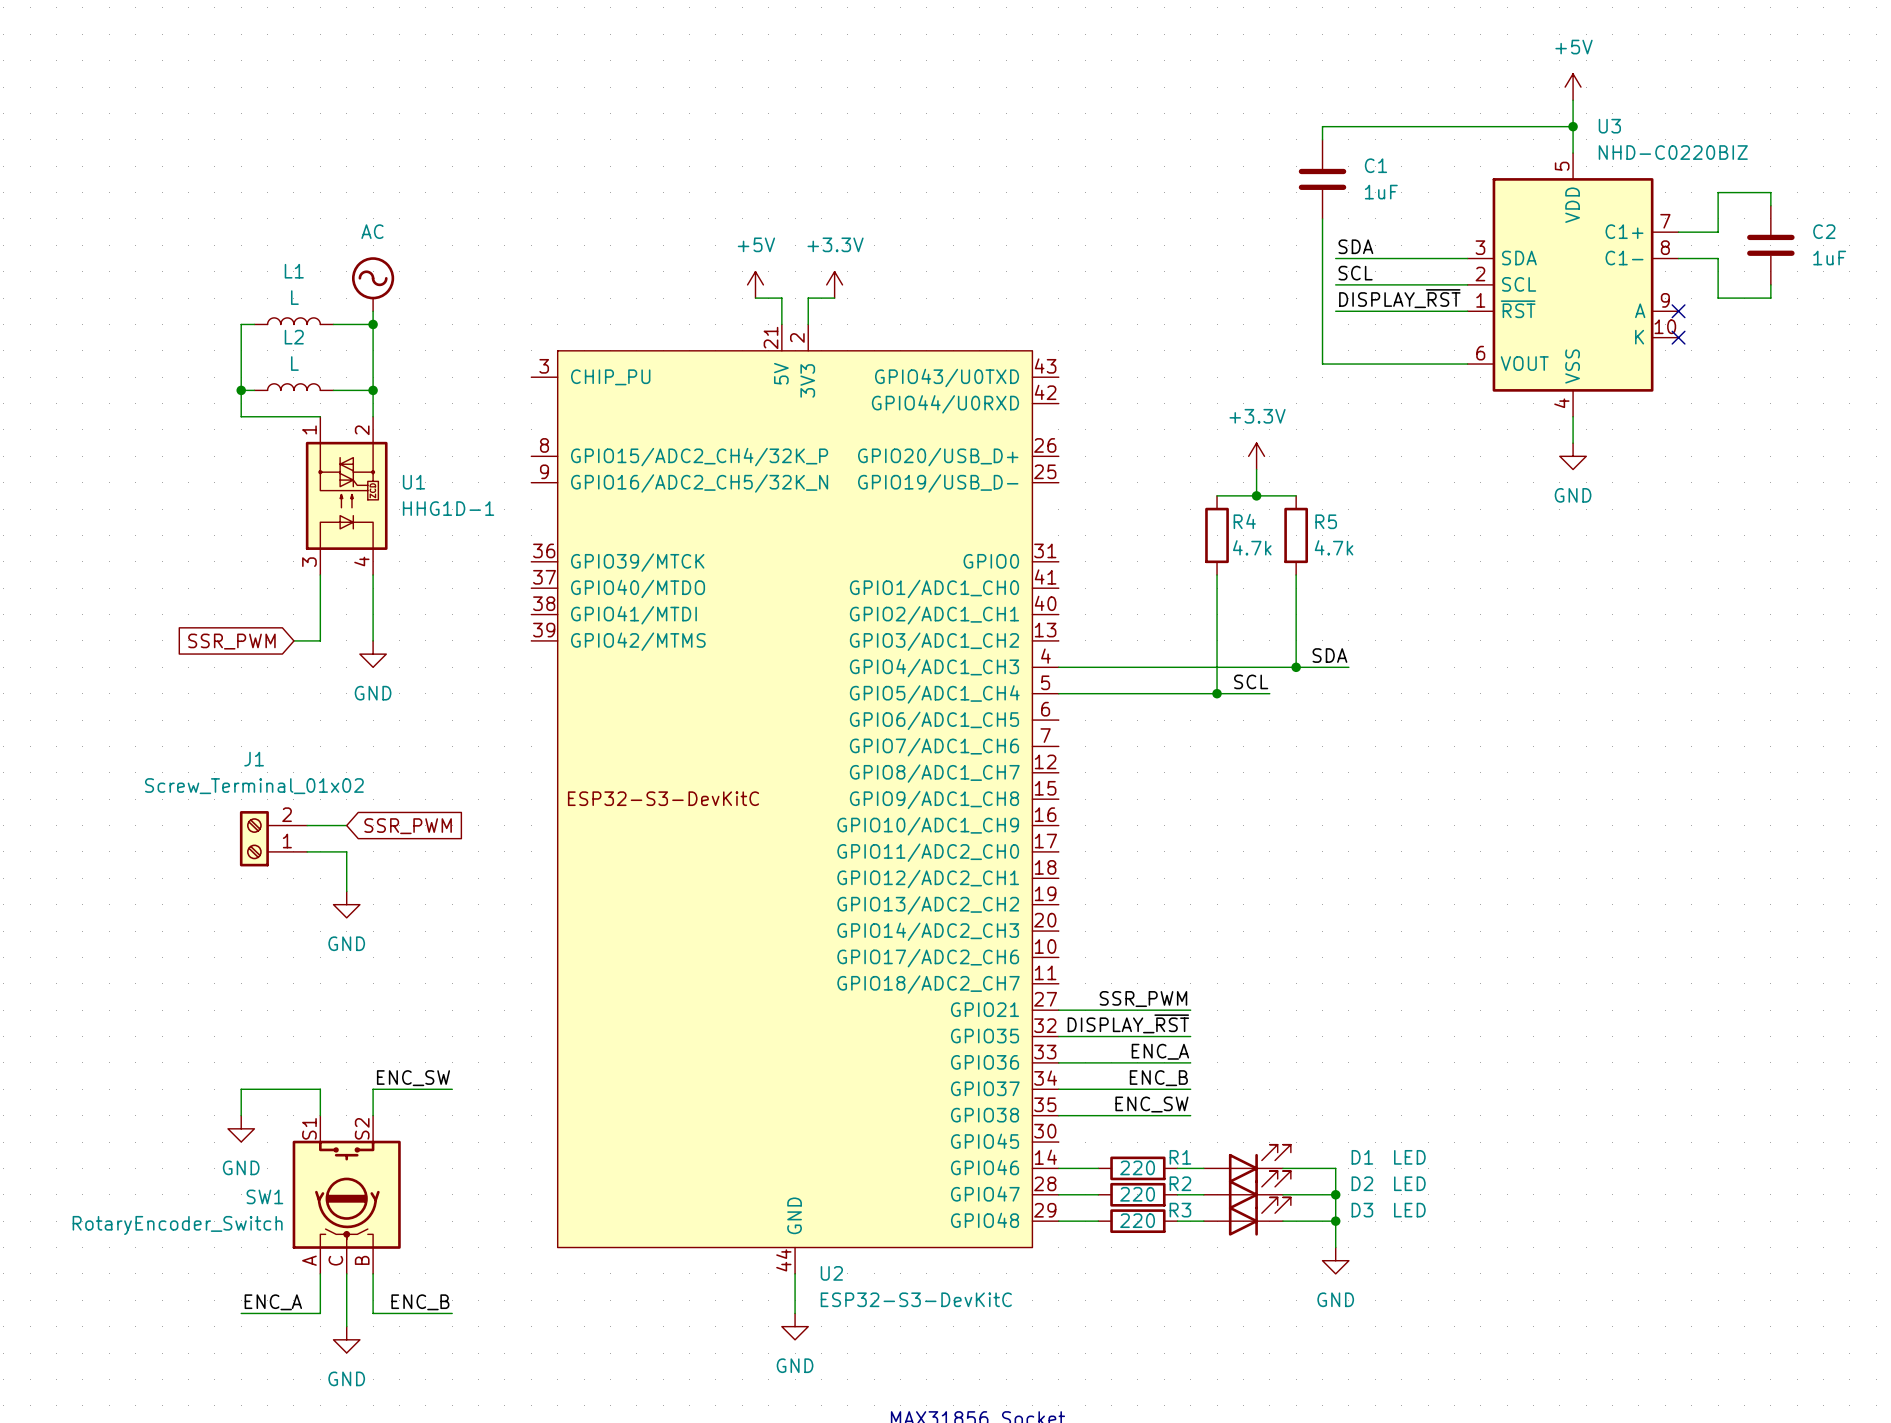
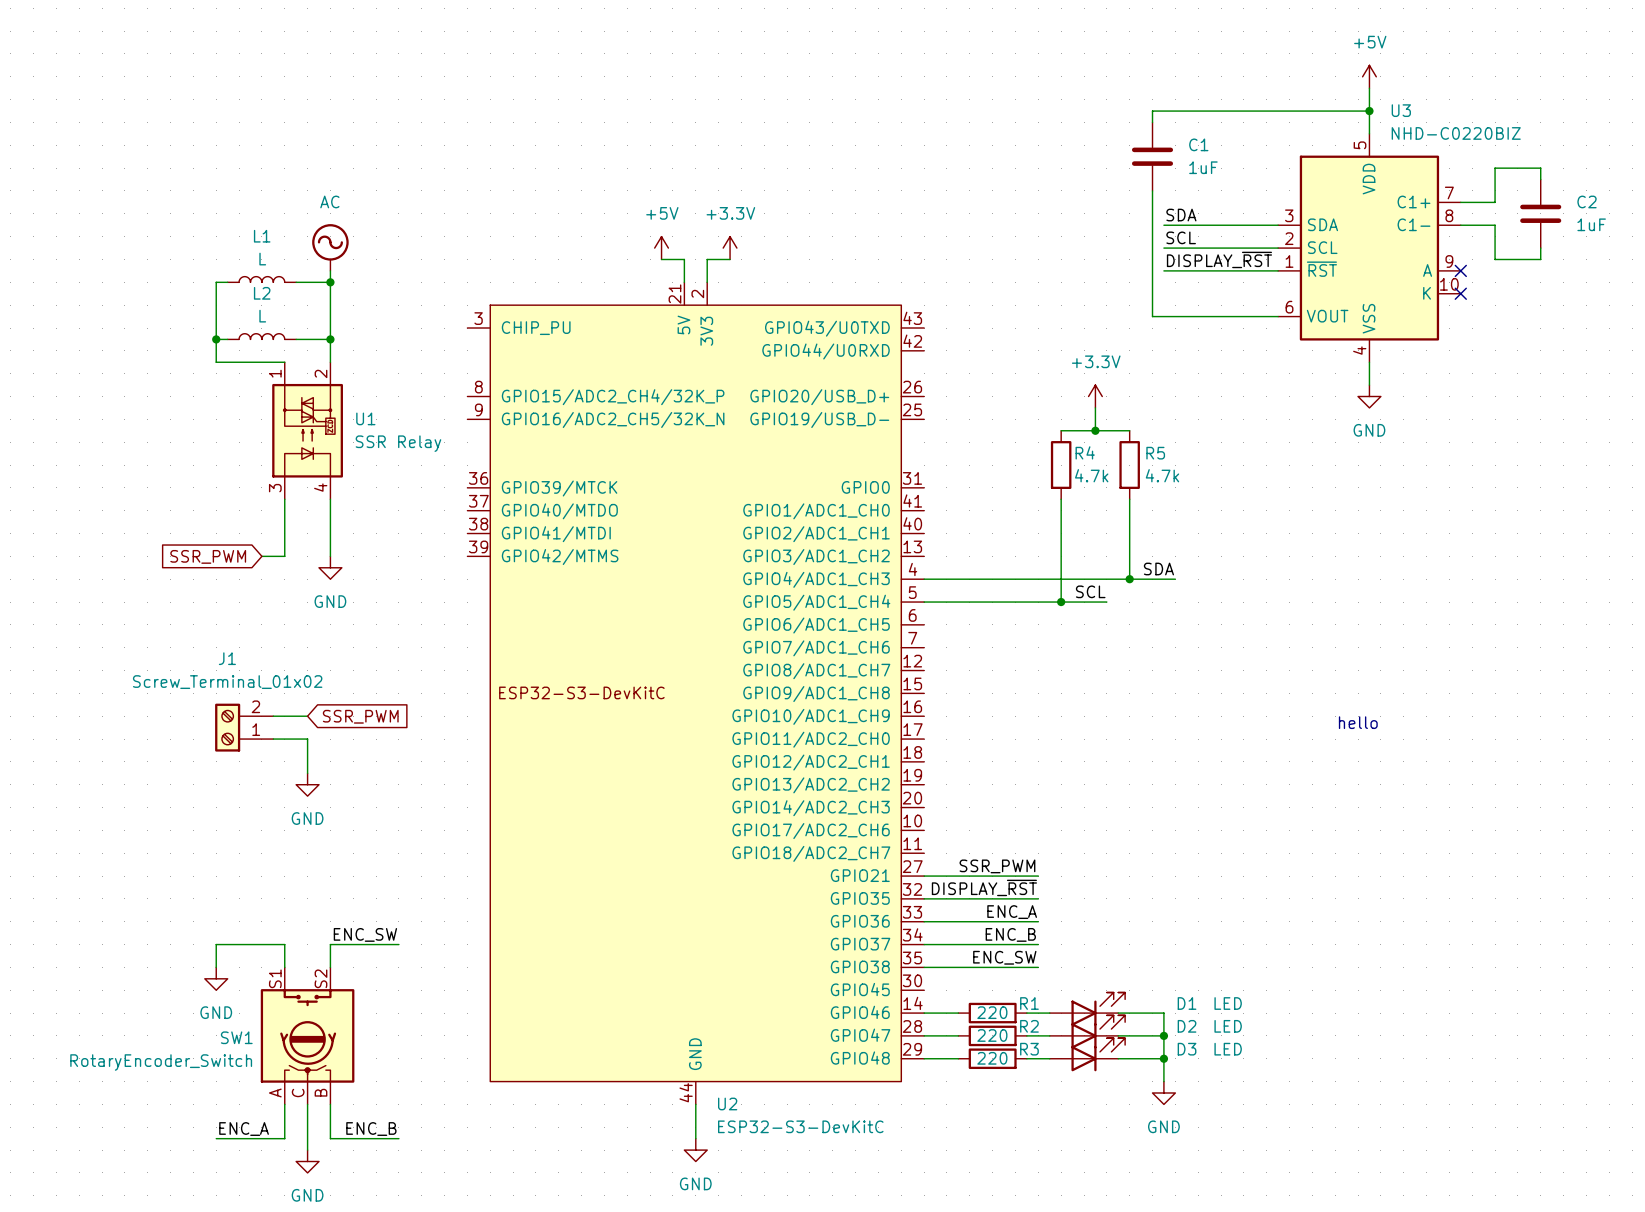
U1 value: HHG1D-1 (448, 508) -> SSR Relay (398, 443)
text: none -> hello (1358, 722)

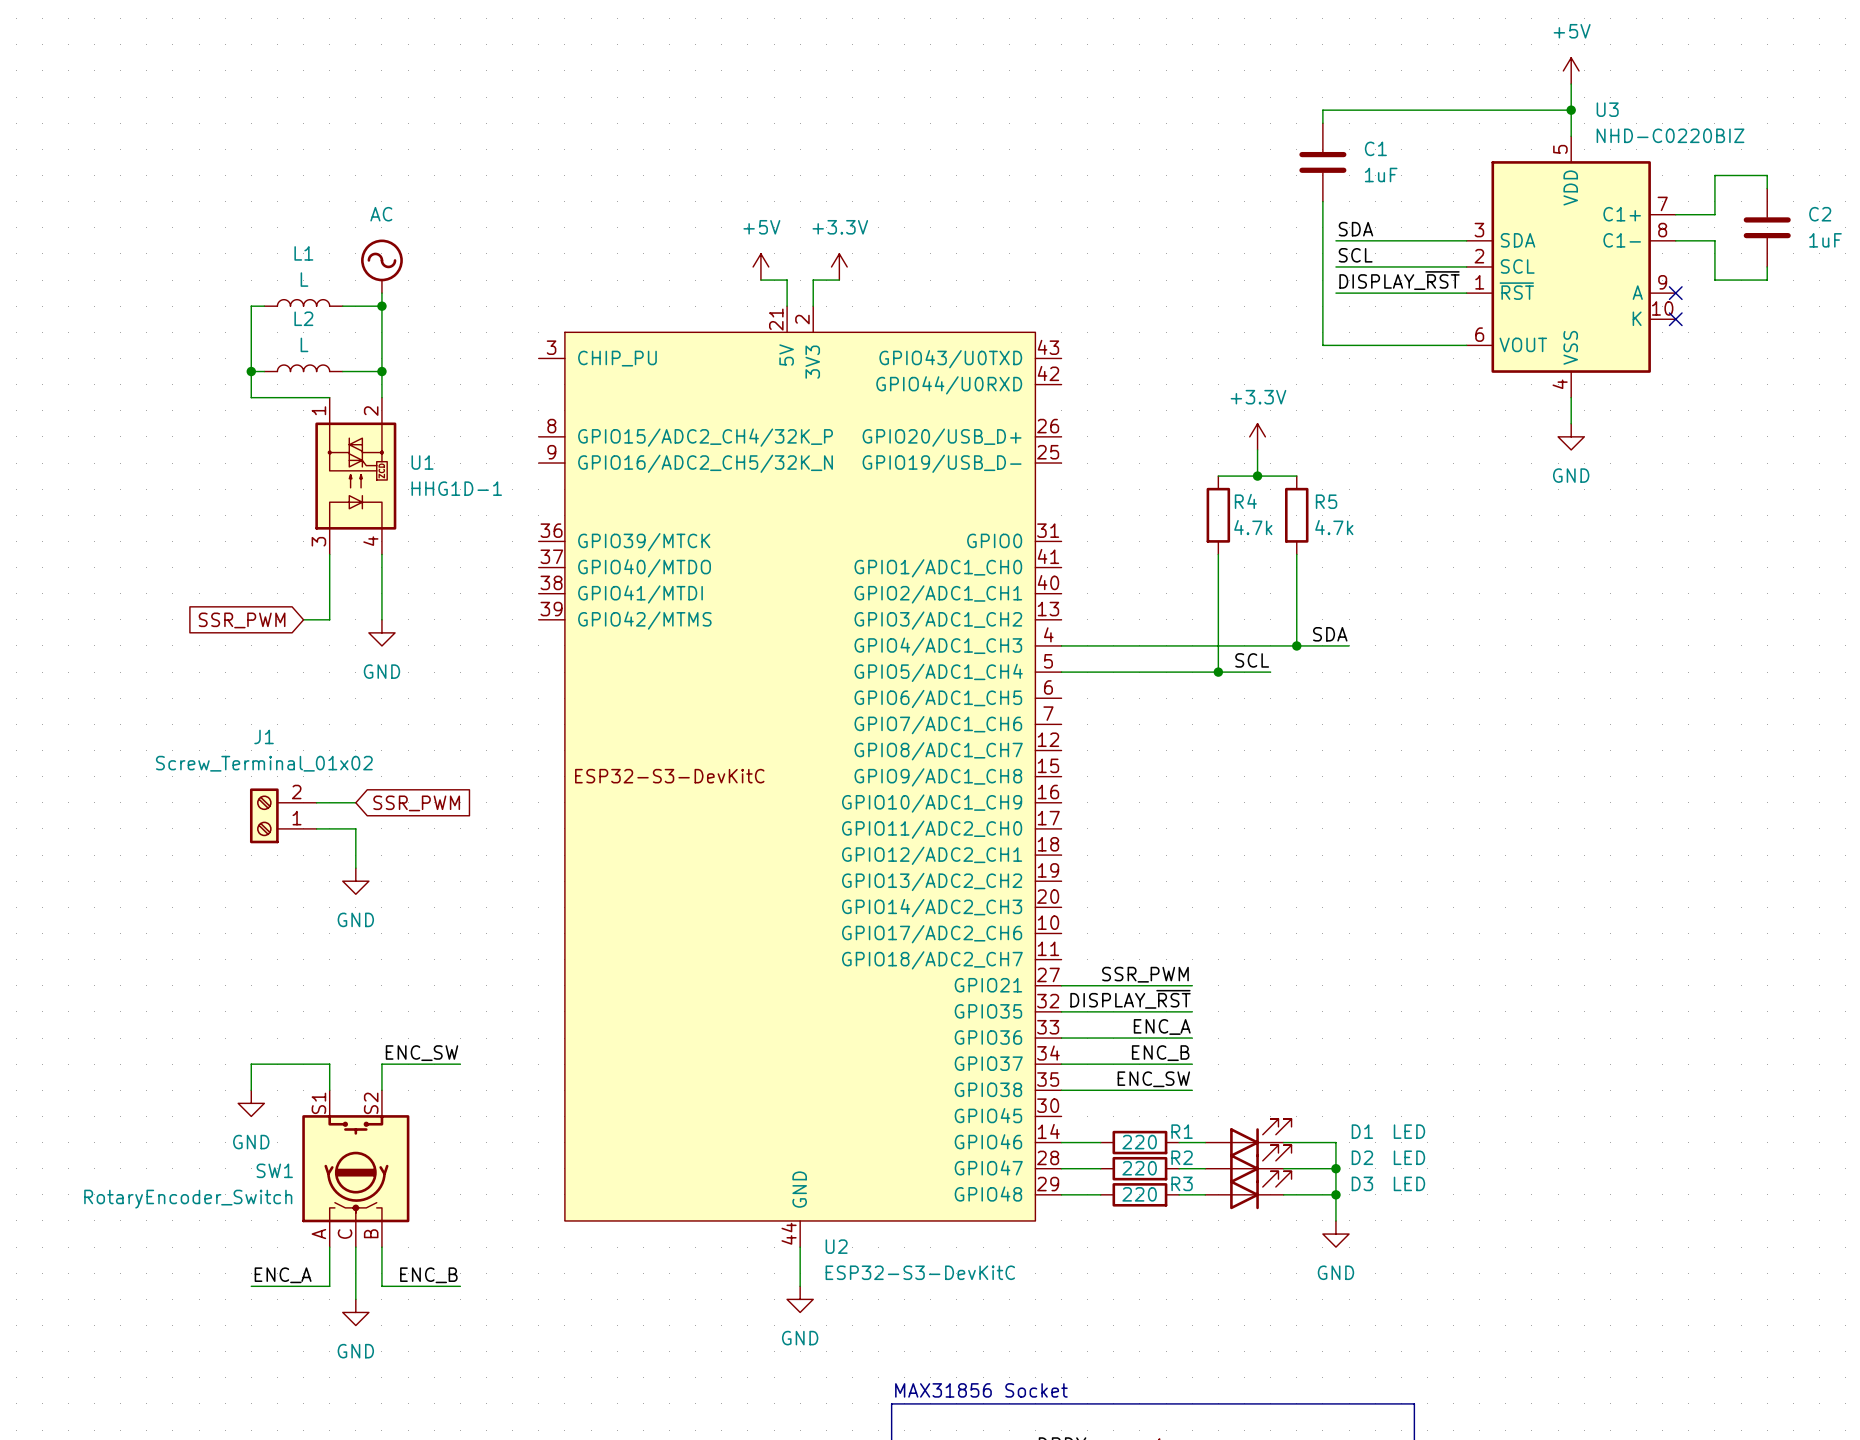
U1 value: SSR Relay (398, 443) -> HHG1D-1 (456, 488)
text: hello (1358, 722) -> none

